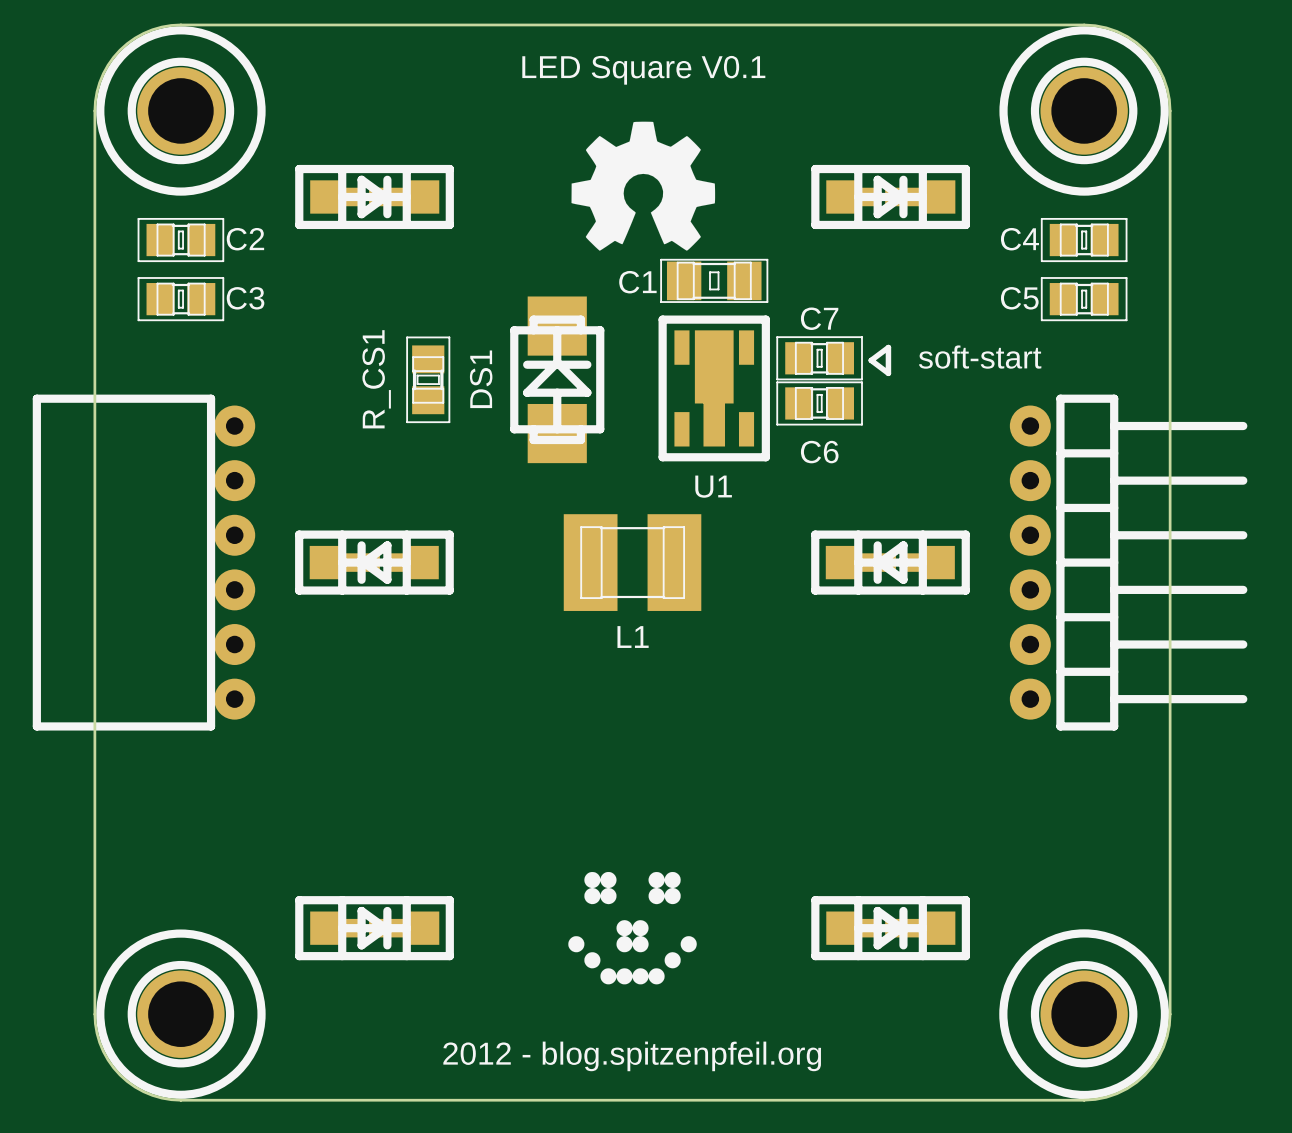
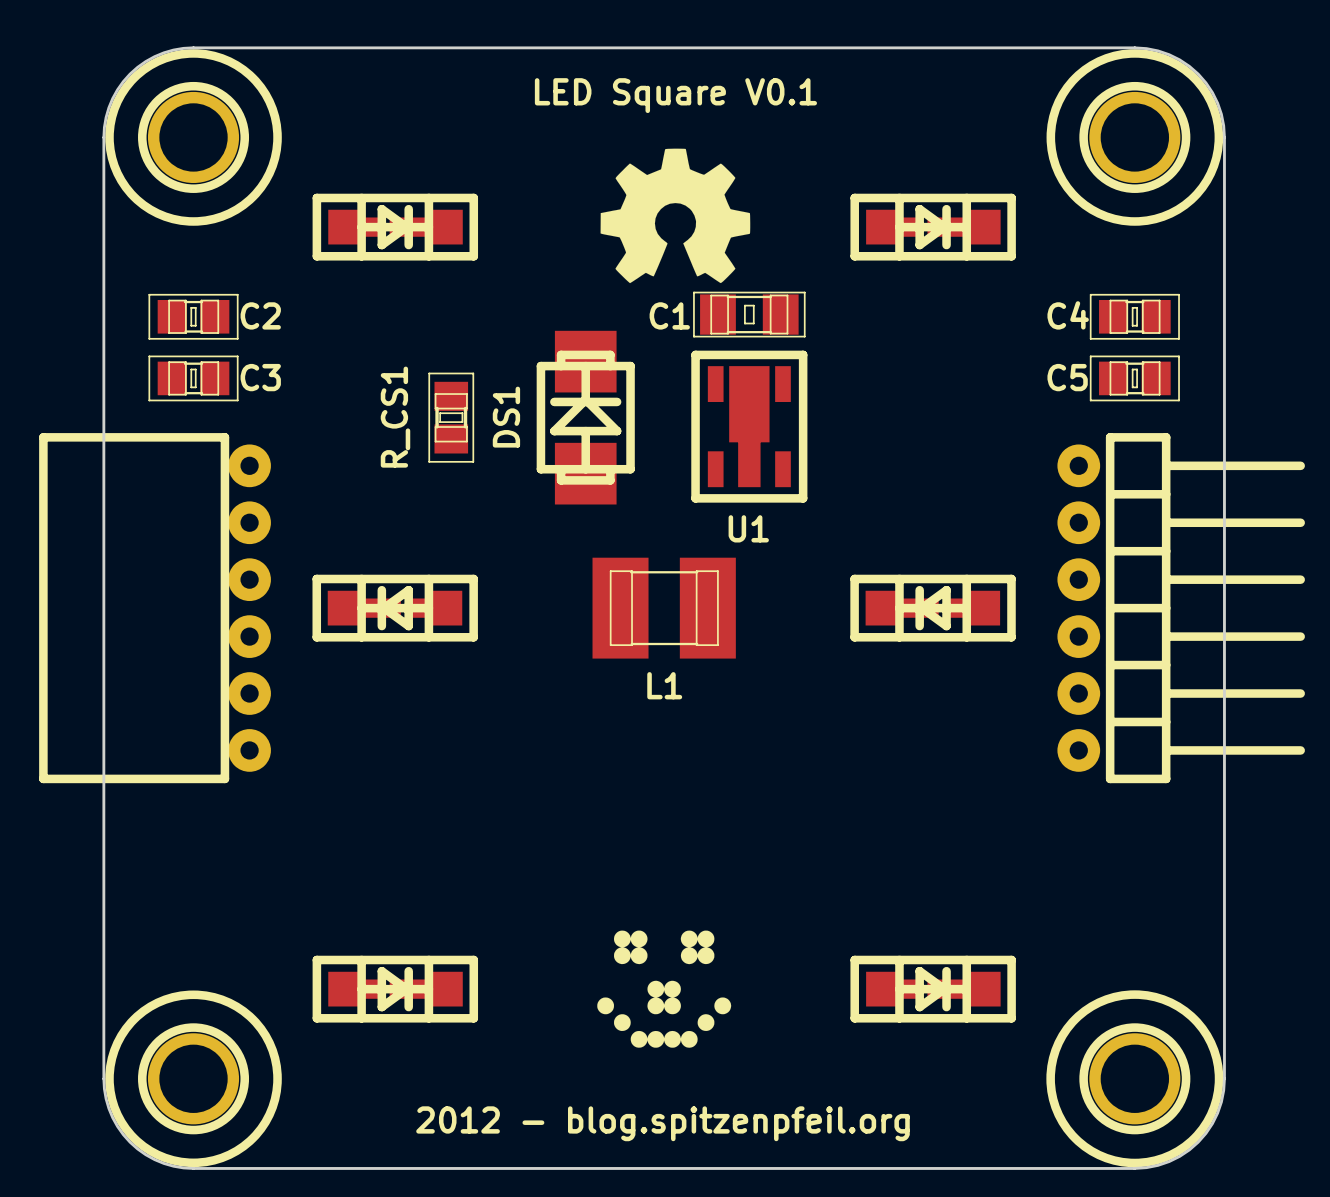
C2 position: (180, 240) -> (193, 316)
C4 position: (1084, 240) -> (1134, 316)
C3 position: (180, 299) -> (193, 378)
C5 position: (1084, 299) -> (1134, 378)
line: (888, 347) (888, 373) (871, 360) (888, 347) -> none
text: soft-start (980, 357) -> none
C7: (819, 358) -> none
C6: (819, 403) -> none

